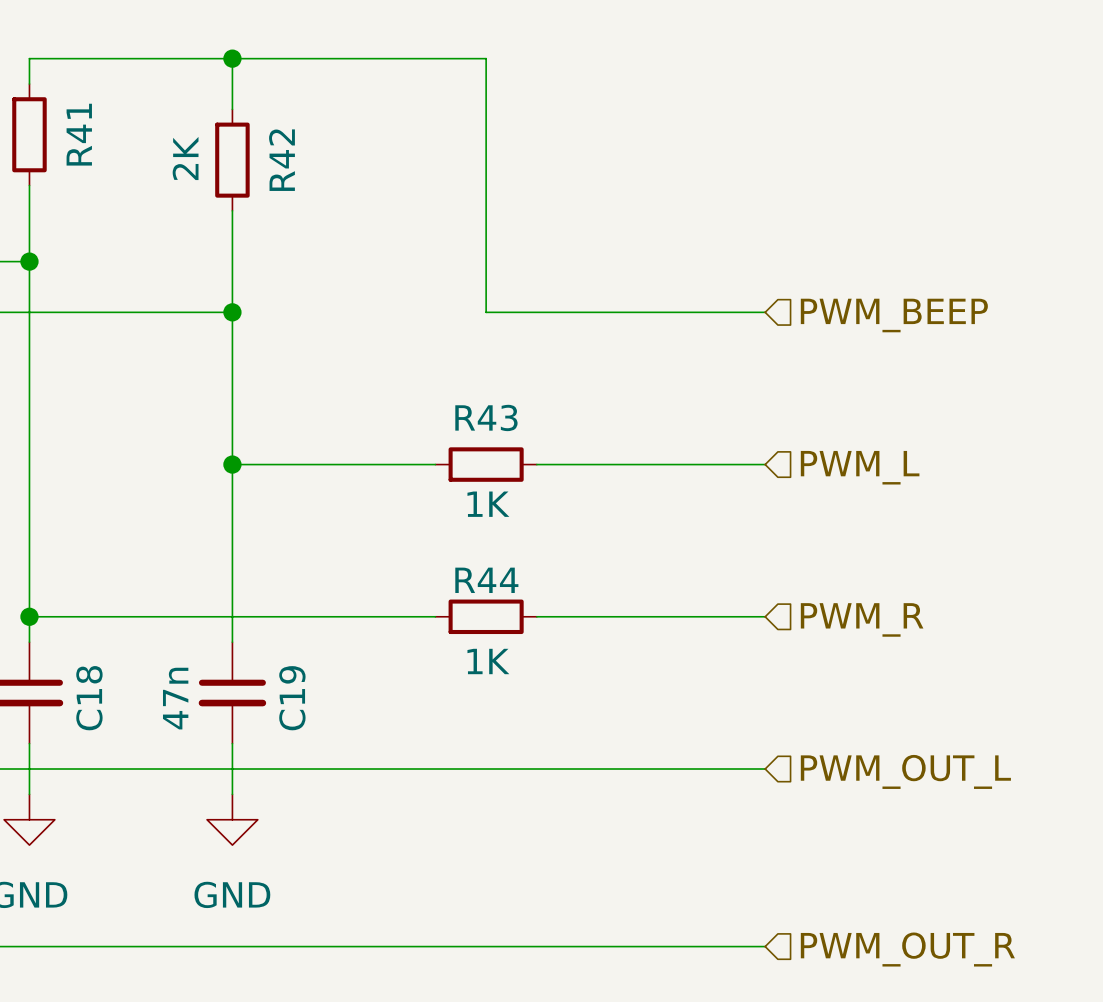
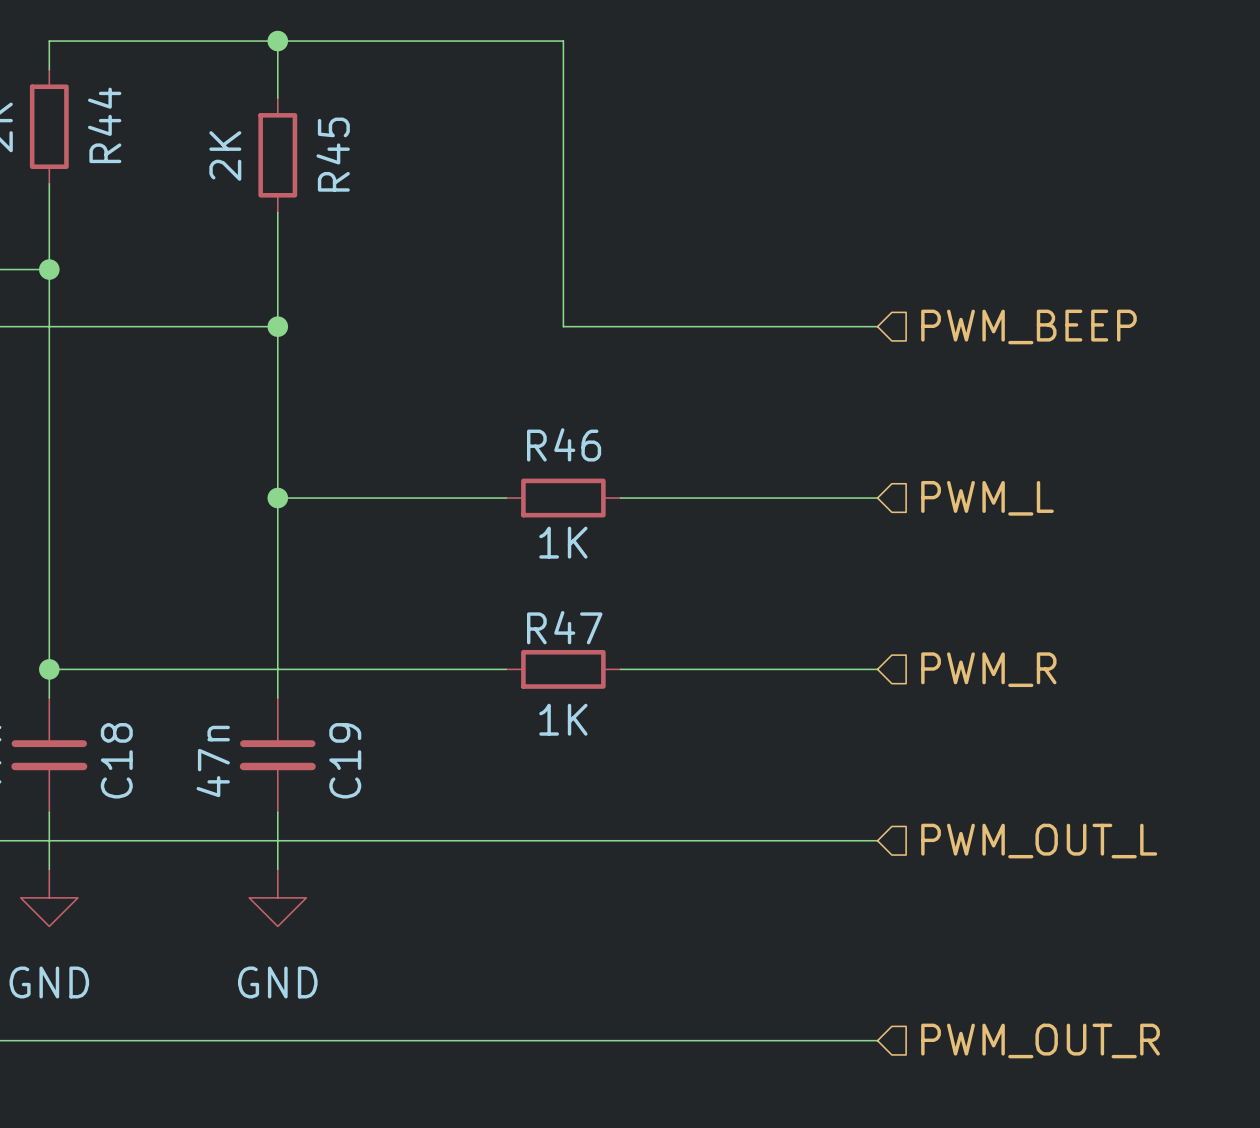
R41 name: R41 (79, 134) -> R44 (104, 125)
R42 name: R42 (281, 160) -> R45 (333, 154)
R43 name: R43 (486, 417) -> R46 (564, 444)
R44 name: R44 (486, 580) -> R47 (564, 627)

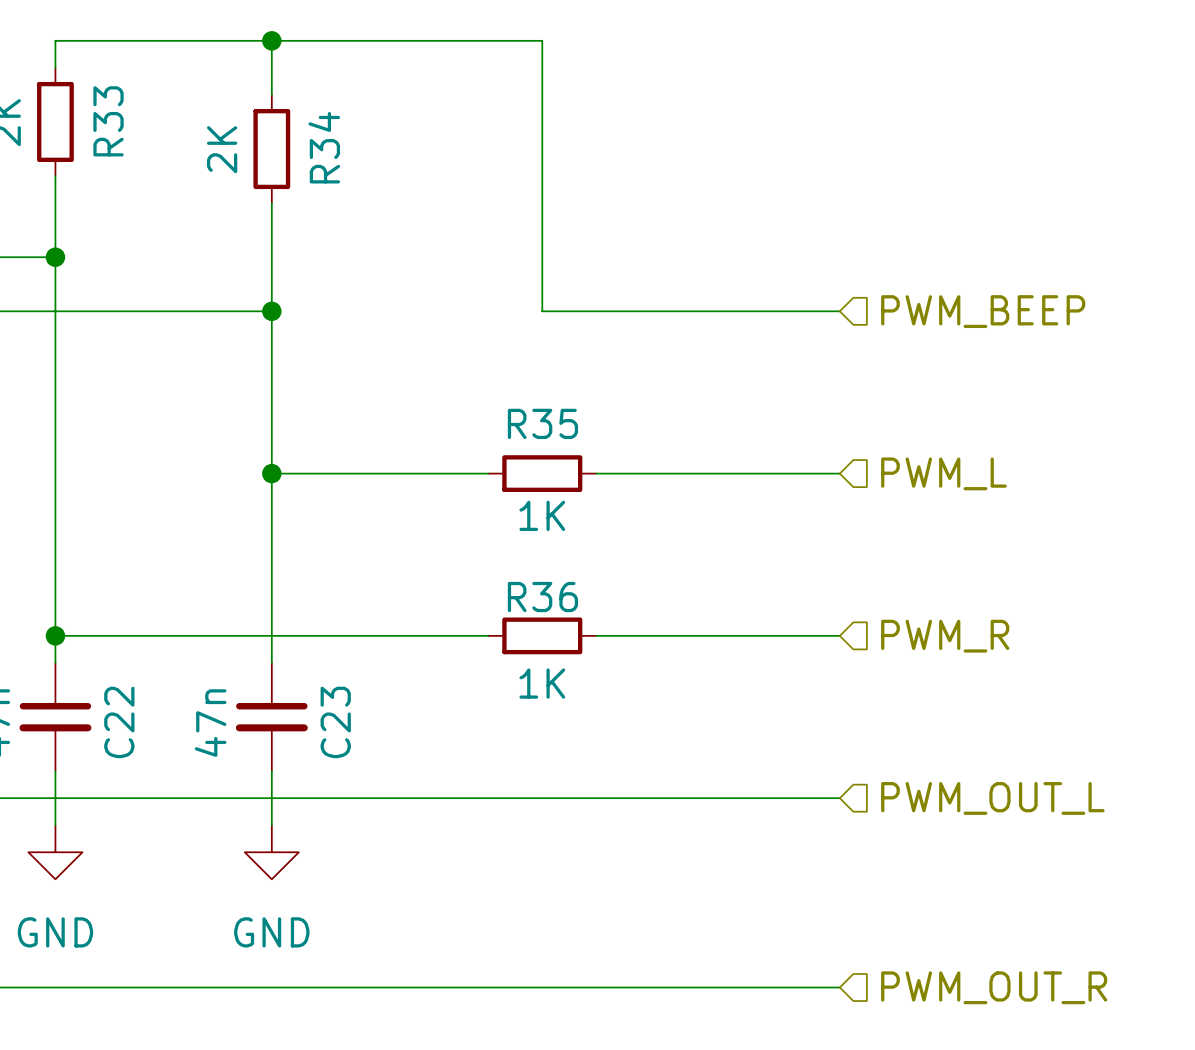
R44 name: R44 (104, 125) -> R33 (108, 121)
R45 name: R45 (333, 154) -> R34 (324, 147)
R46 name: R46 (564, 444) -> R35 (542, 423)
R47 name: R47 (564, 627) -> R36 (542, 597)
C18 name: C18 (116, 760) -> C22 (119, 722)
C19 name: C19 (345, 760) -> C23 (335, 722)

